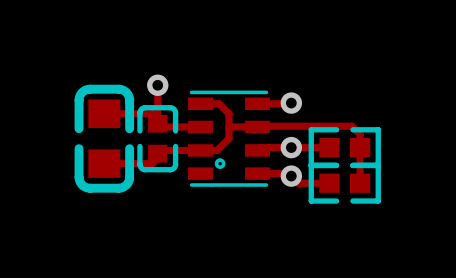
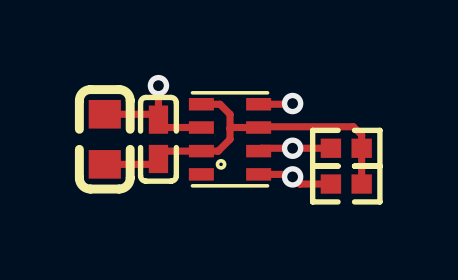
part footprint: [137, 105, 179, 173] -> [137, 94, 180, 184]

